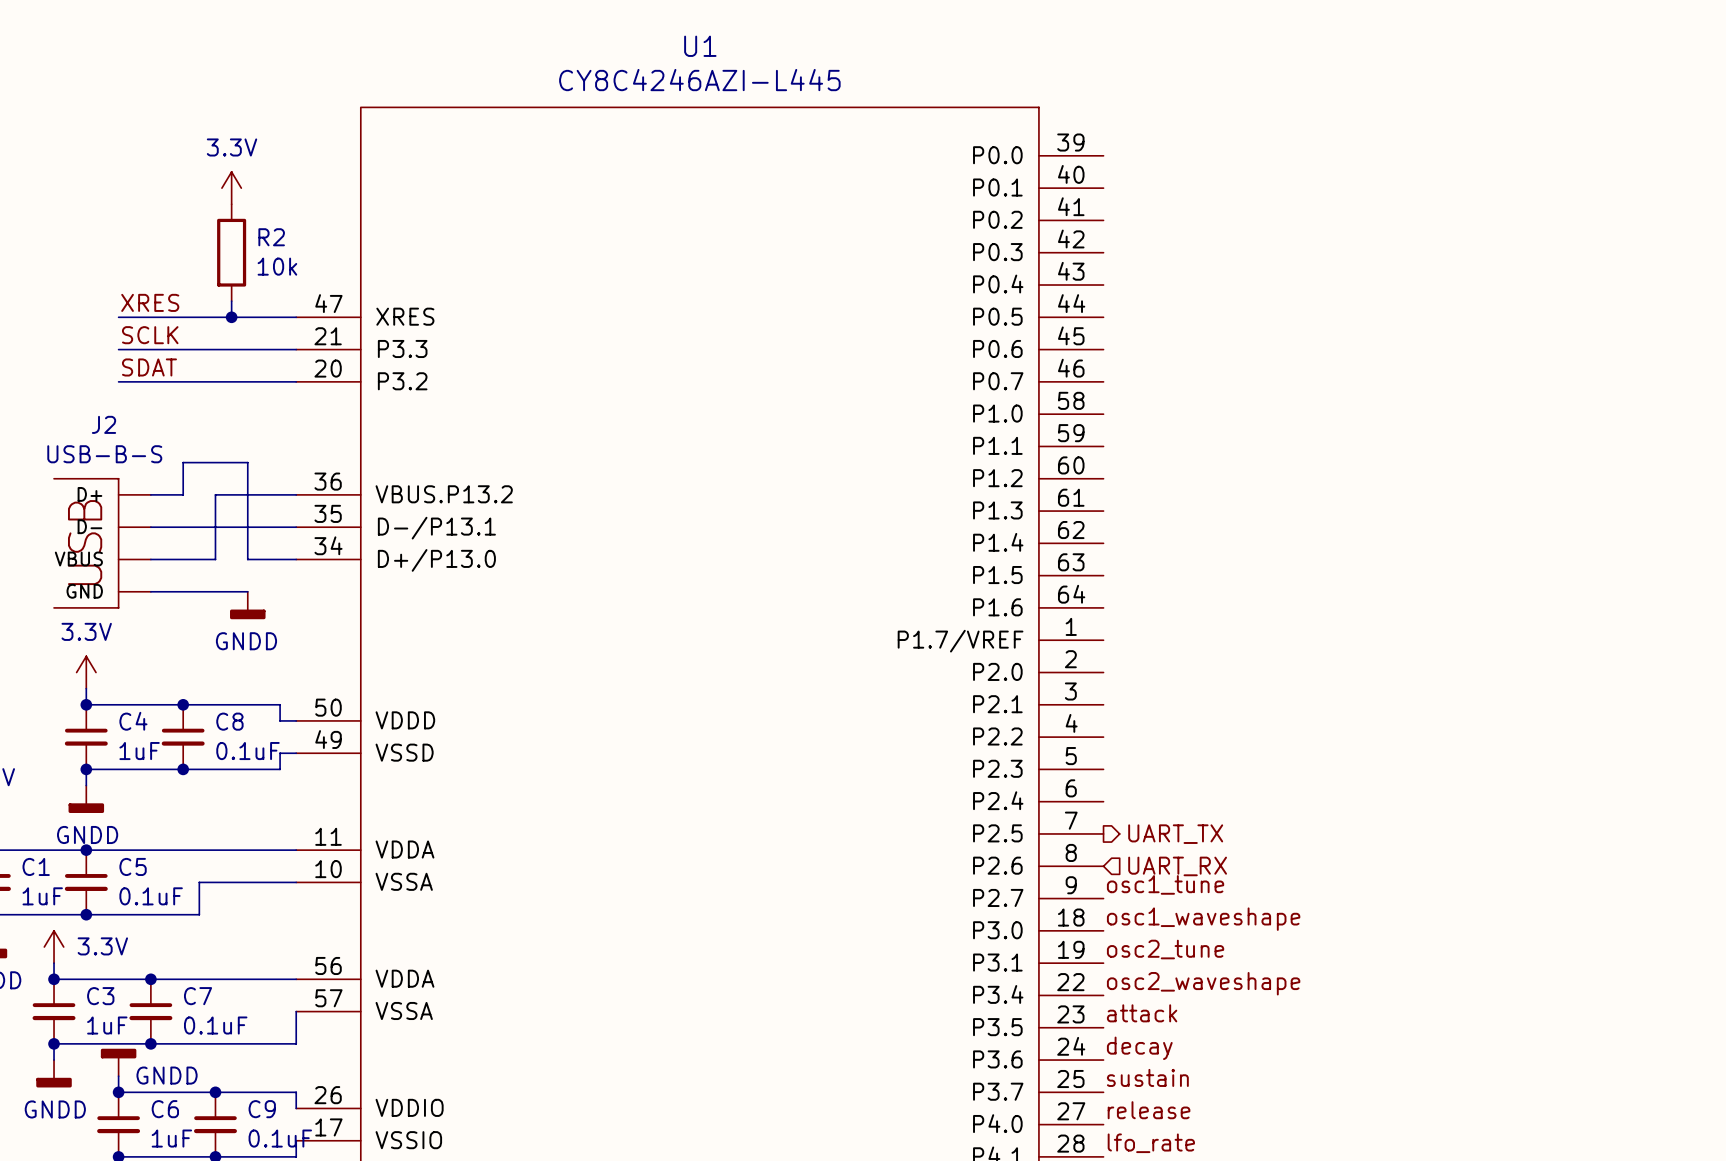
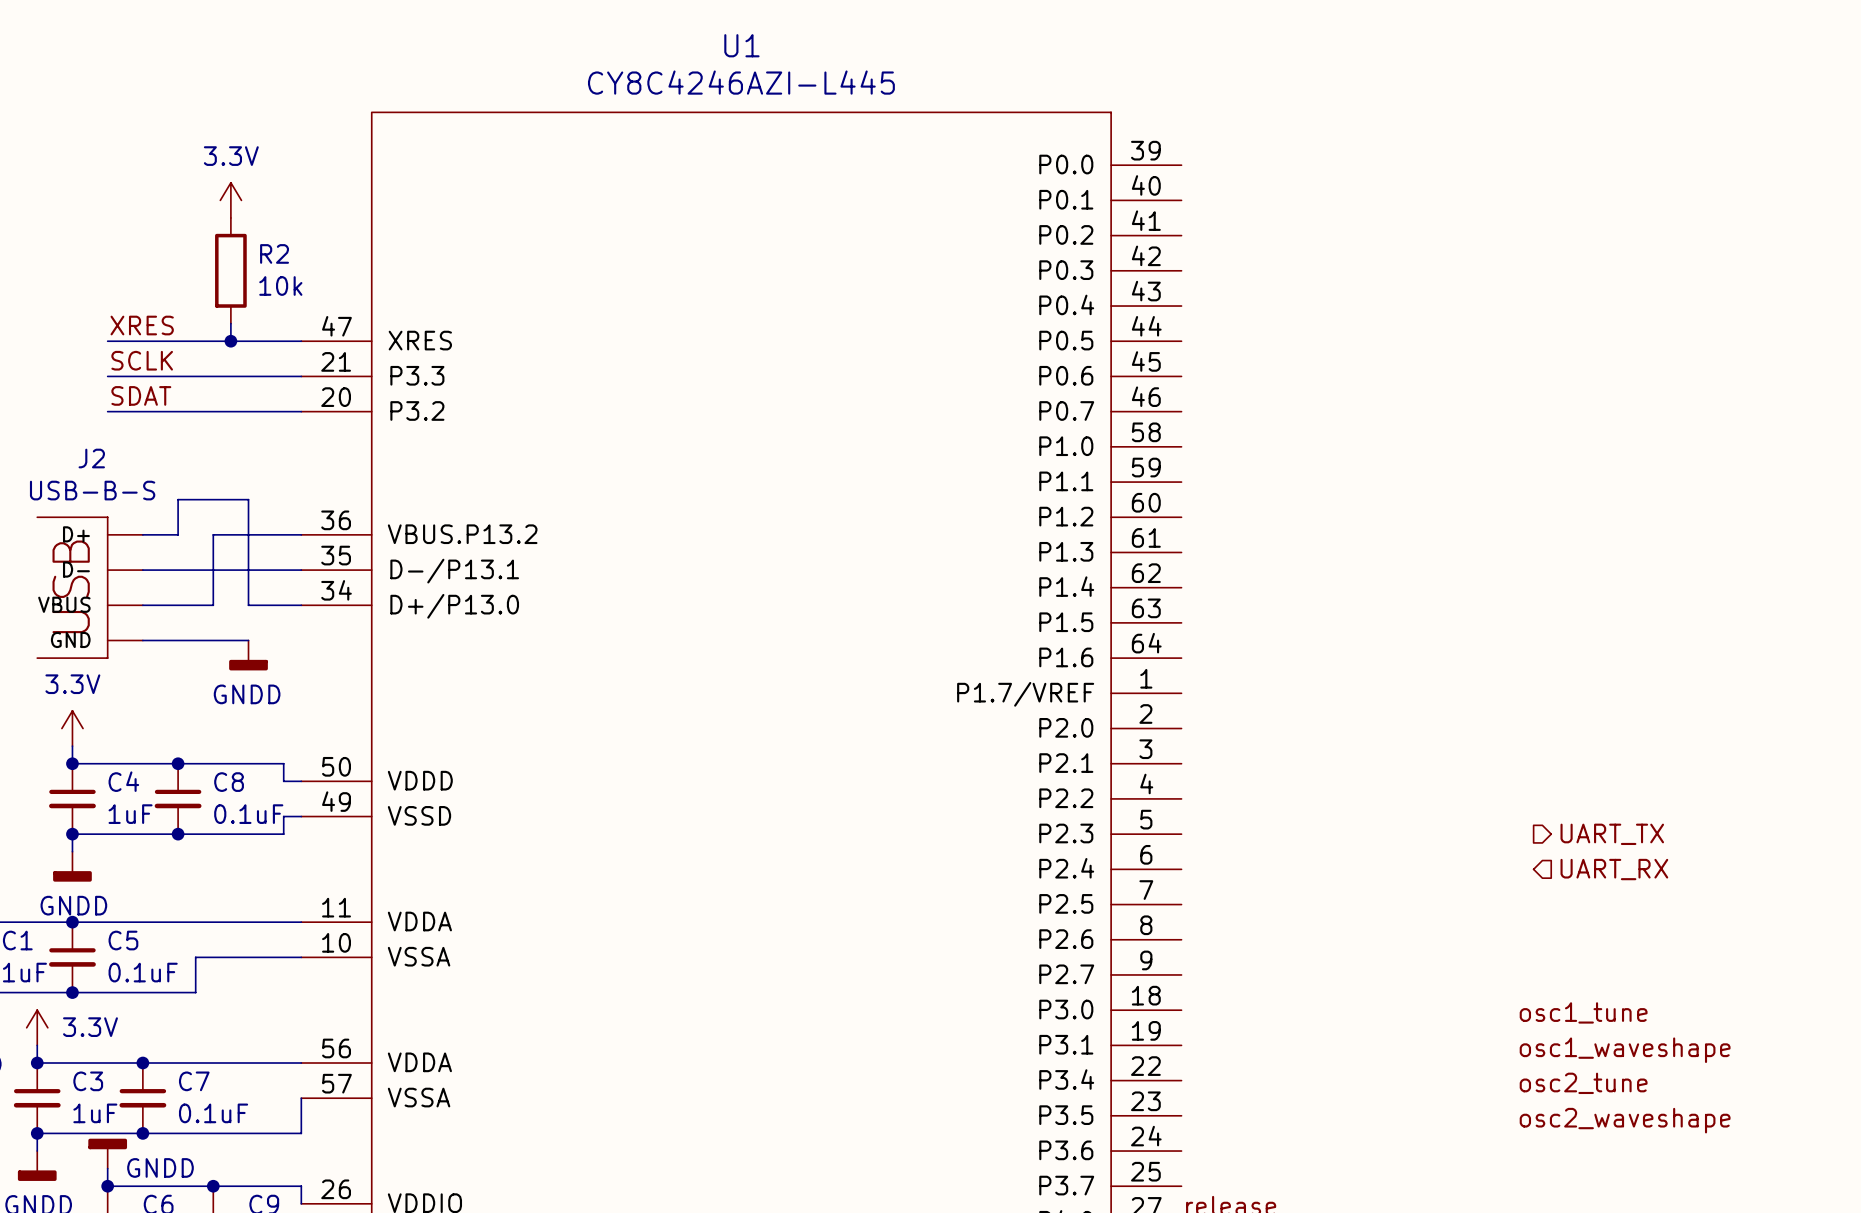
hierarchical label: none -> UART_TX (1612, 834)
hierarchical label: none -> UART_RX (1614, 869)
hierarchical label: UART_TX (1175, 834) -> none
hierarchical label: UART_RX (1177, 866) -> none
label: osc1_tune (1165, 884) -> none
label position: osc1_waveshape (1203, 919) -> osc1_waveshape (1625, 1050)
label: none -> osc1_tune (1583, 1012)
label: osc2_tune (1165, 949) -> none
label position: osc2_waveshape (1203, 983) -> osc2_waveshape (1625, 1120)
label: none -> osc2_tune (1583, 1083)
label: attack (1142, 1013) -> none
label: decay (1139, 1048) -> none
label: sustain (1147, 1077) -> none

